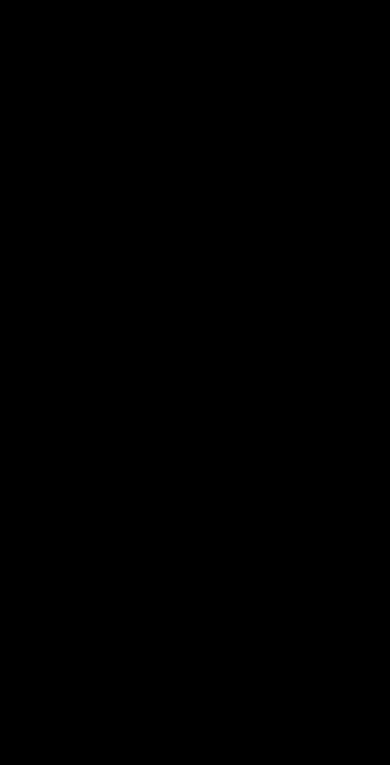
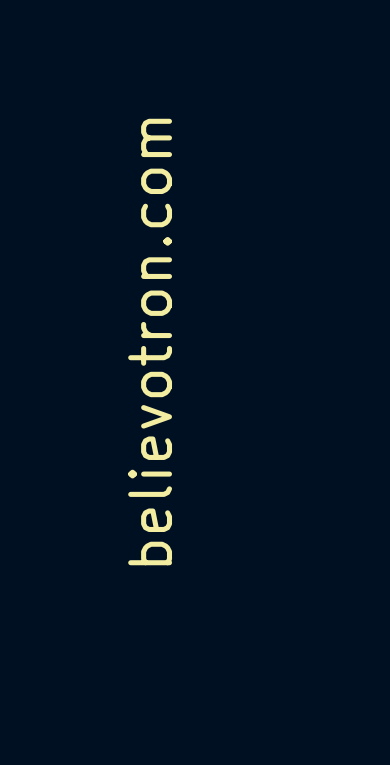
text: none -> believotron.com (150, 342)

